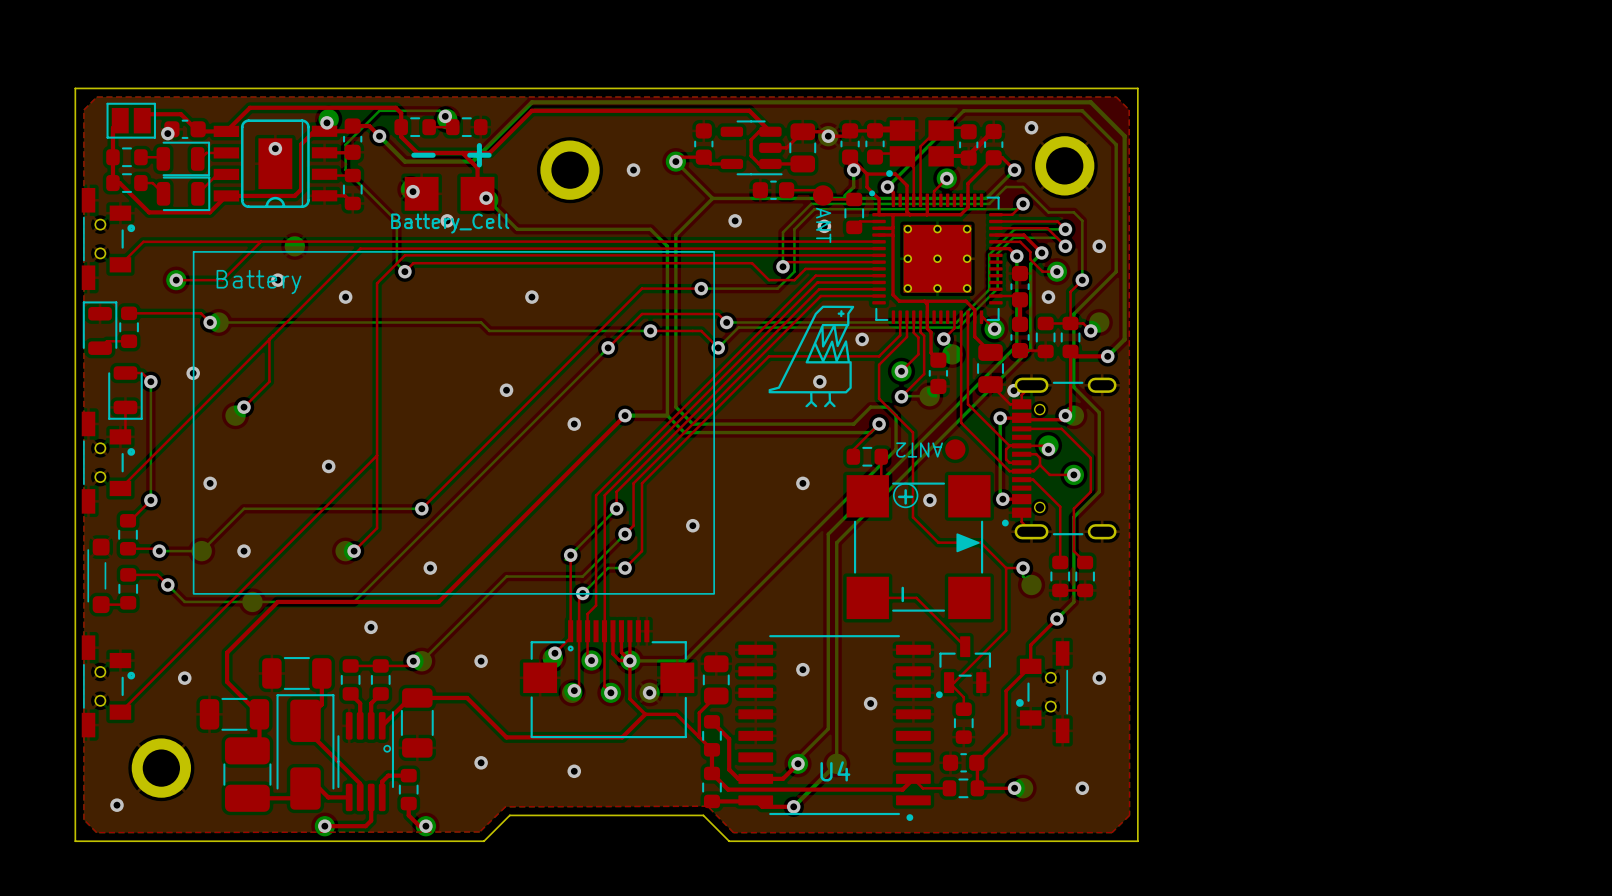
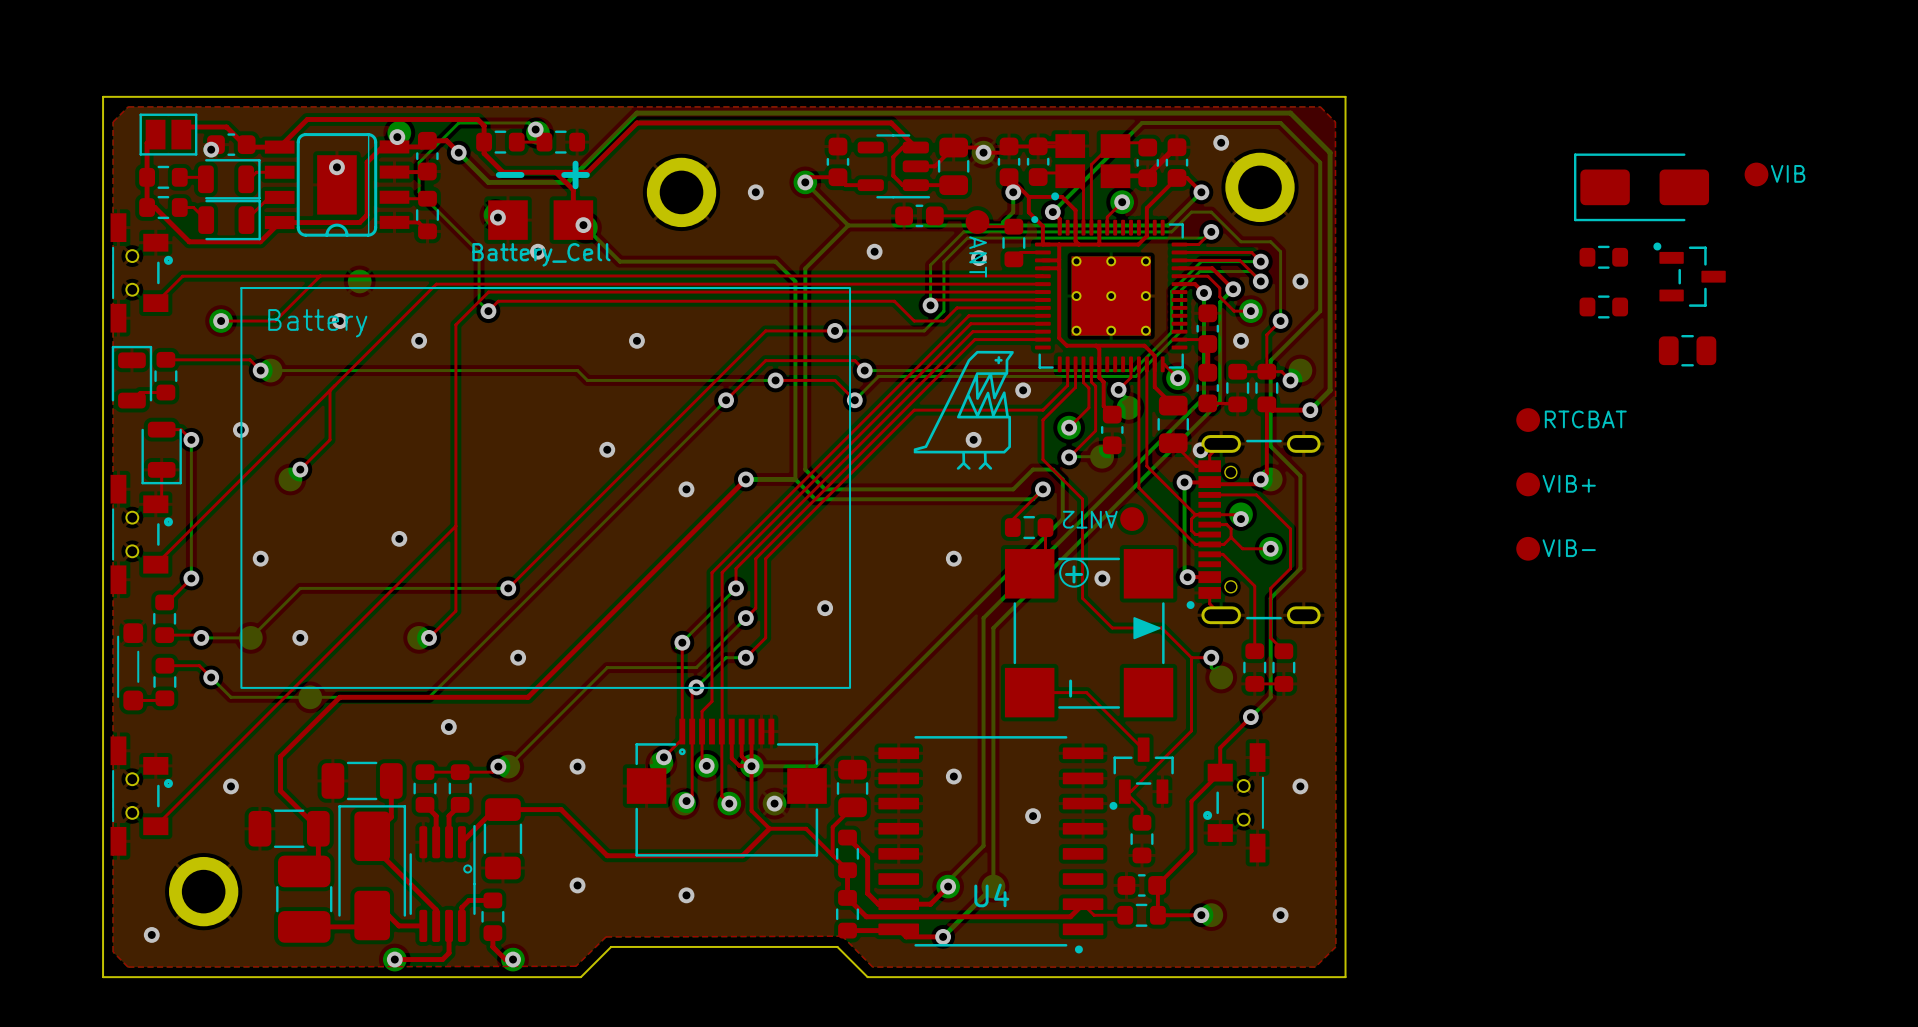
part: none -> VIB (1756, 174)
part: none -> (1641, 187)
part: none -> (1603, 257)
part: none -> (1689, 274)
part: none -> (1603, 306)
part: none -> (1687, 350)
part: none -> RTCBAT (1528, 420)
part: none -> VIB+ (1528, 484)
part: none -> VIB- (1528, 548)

